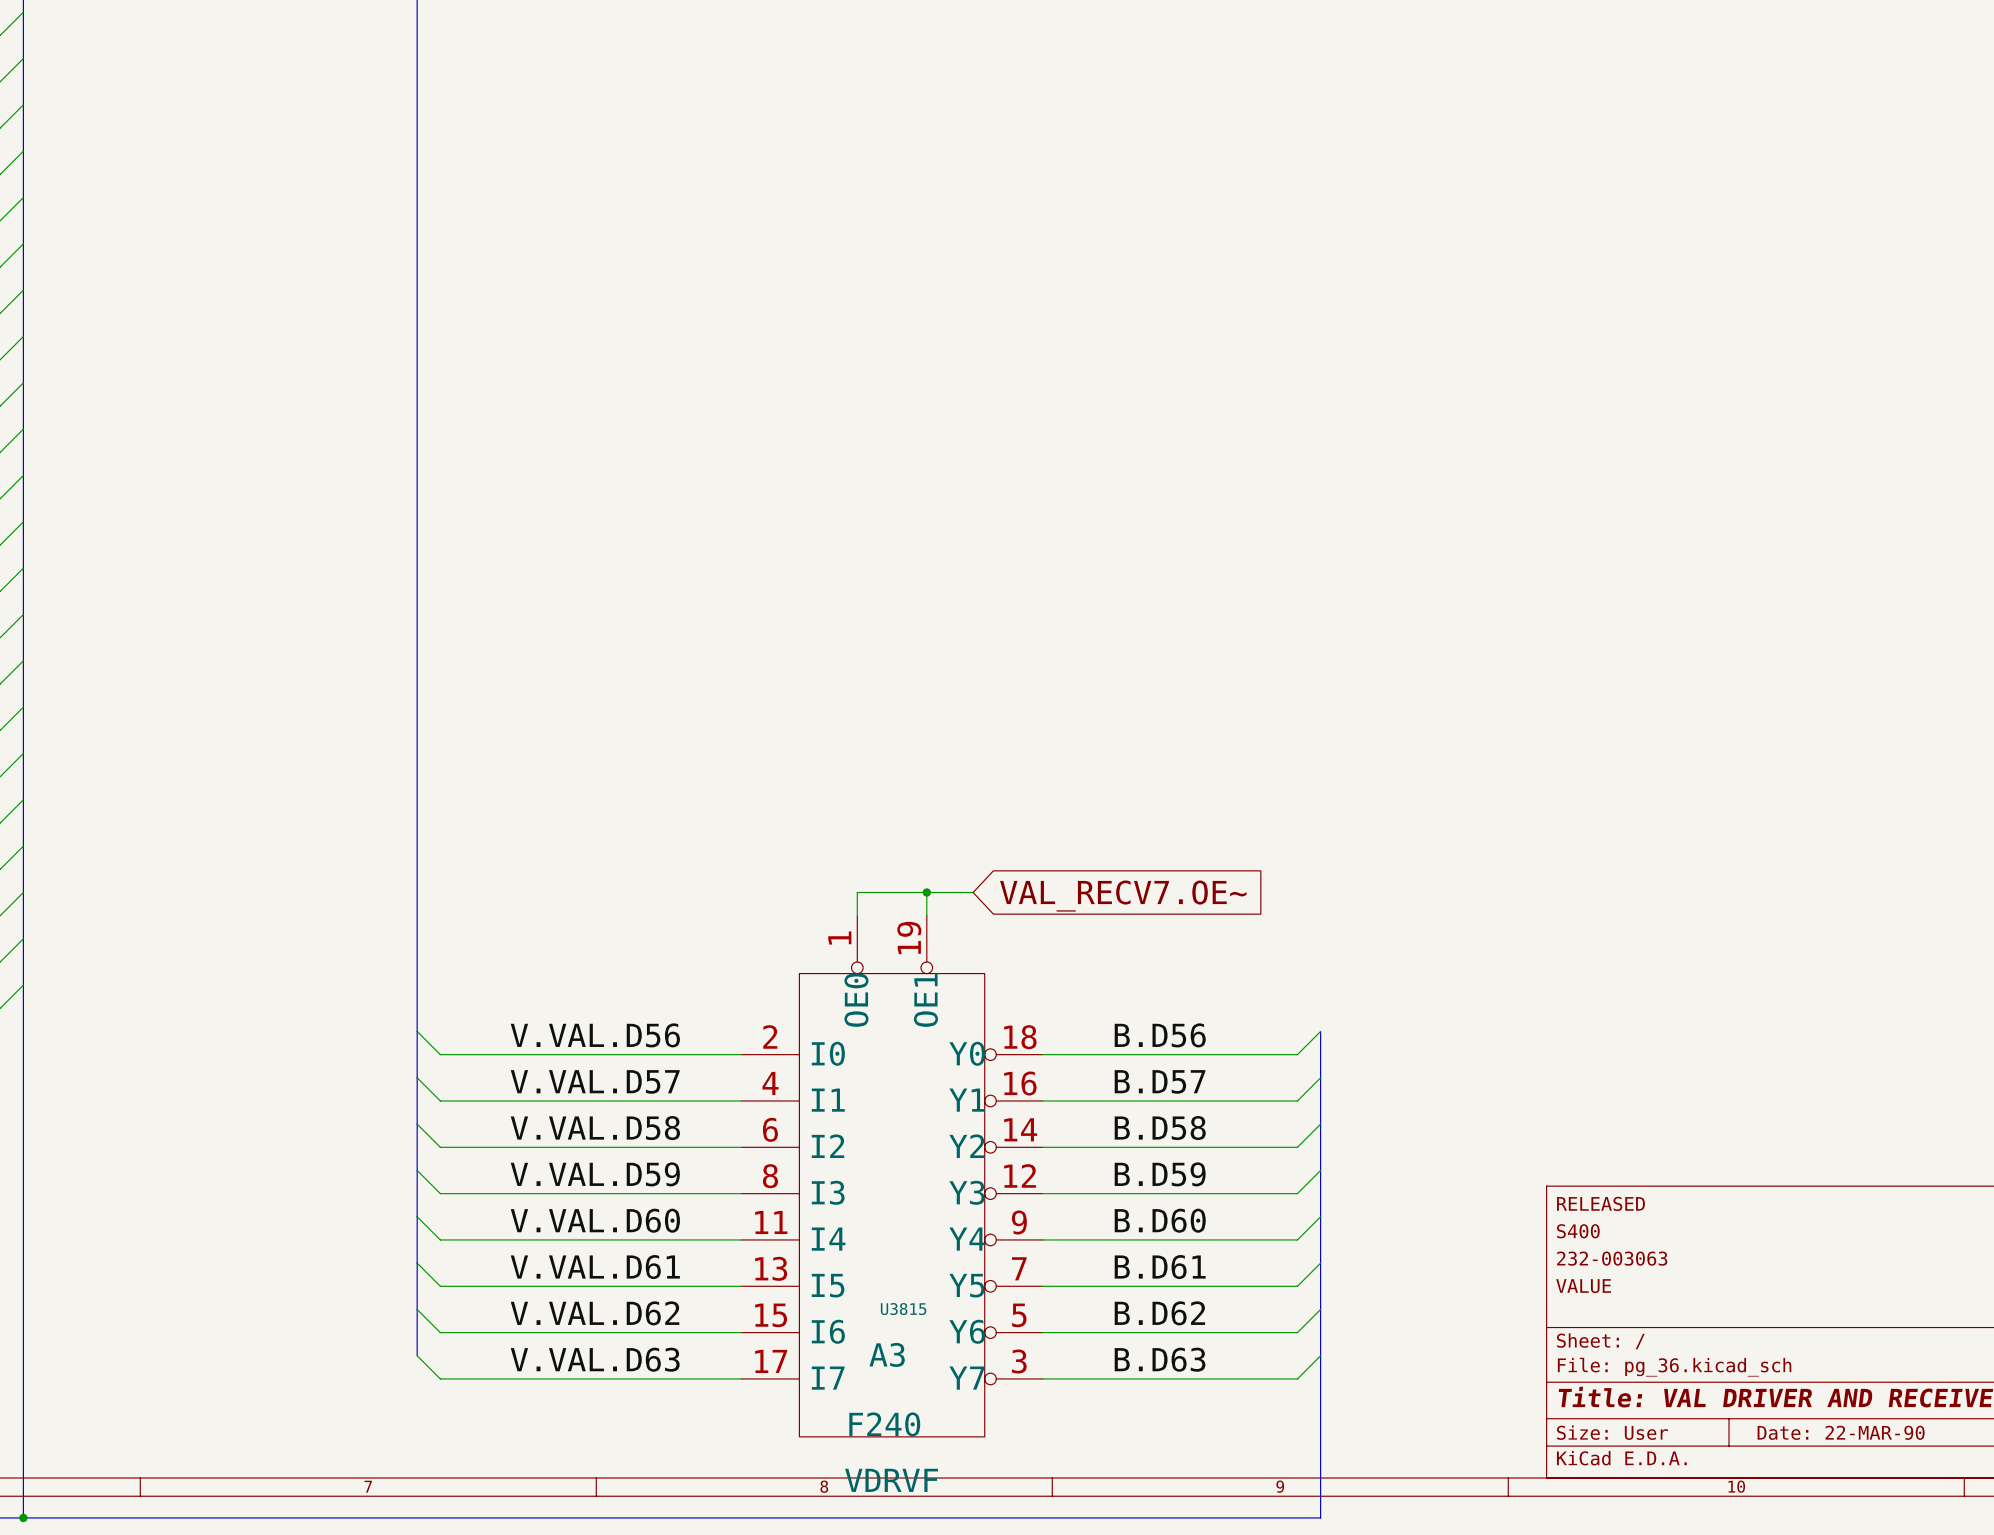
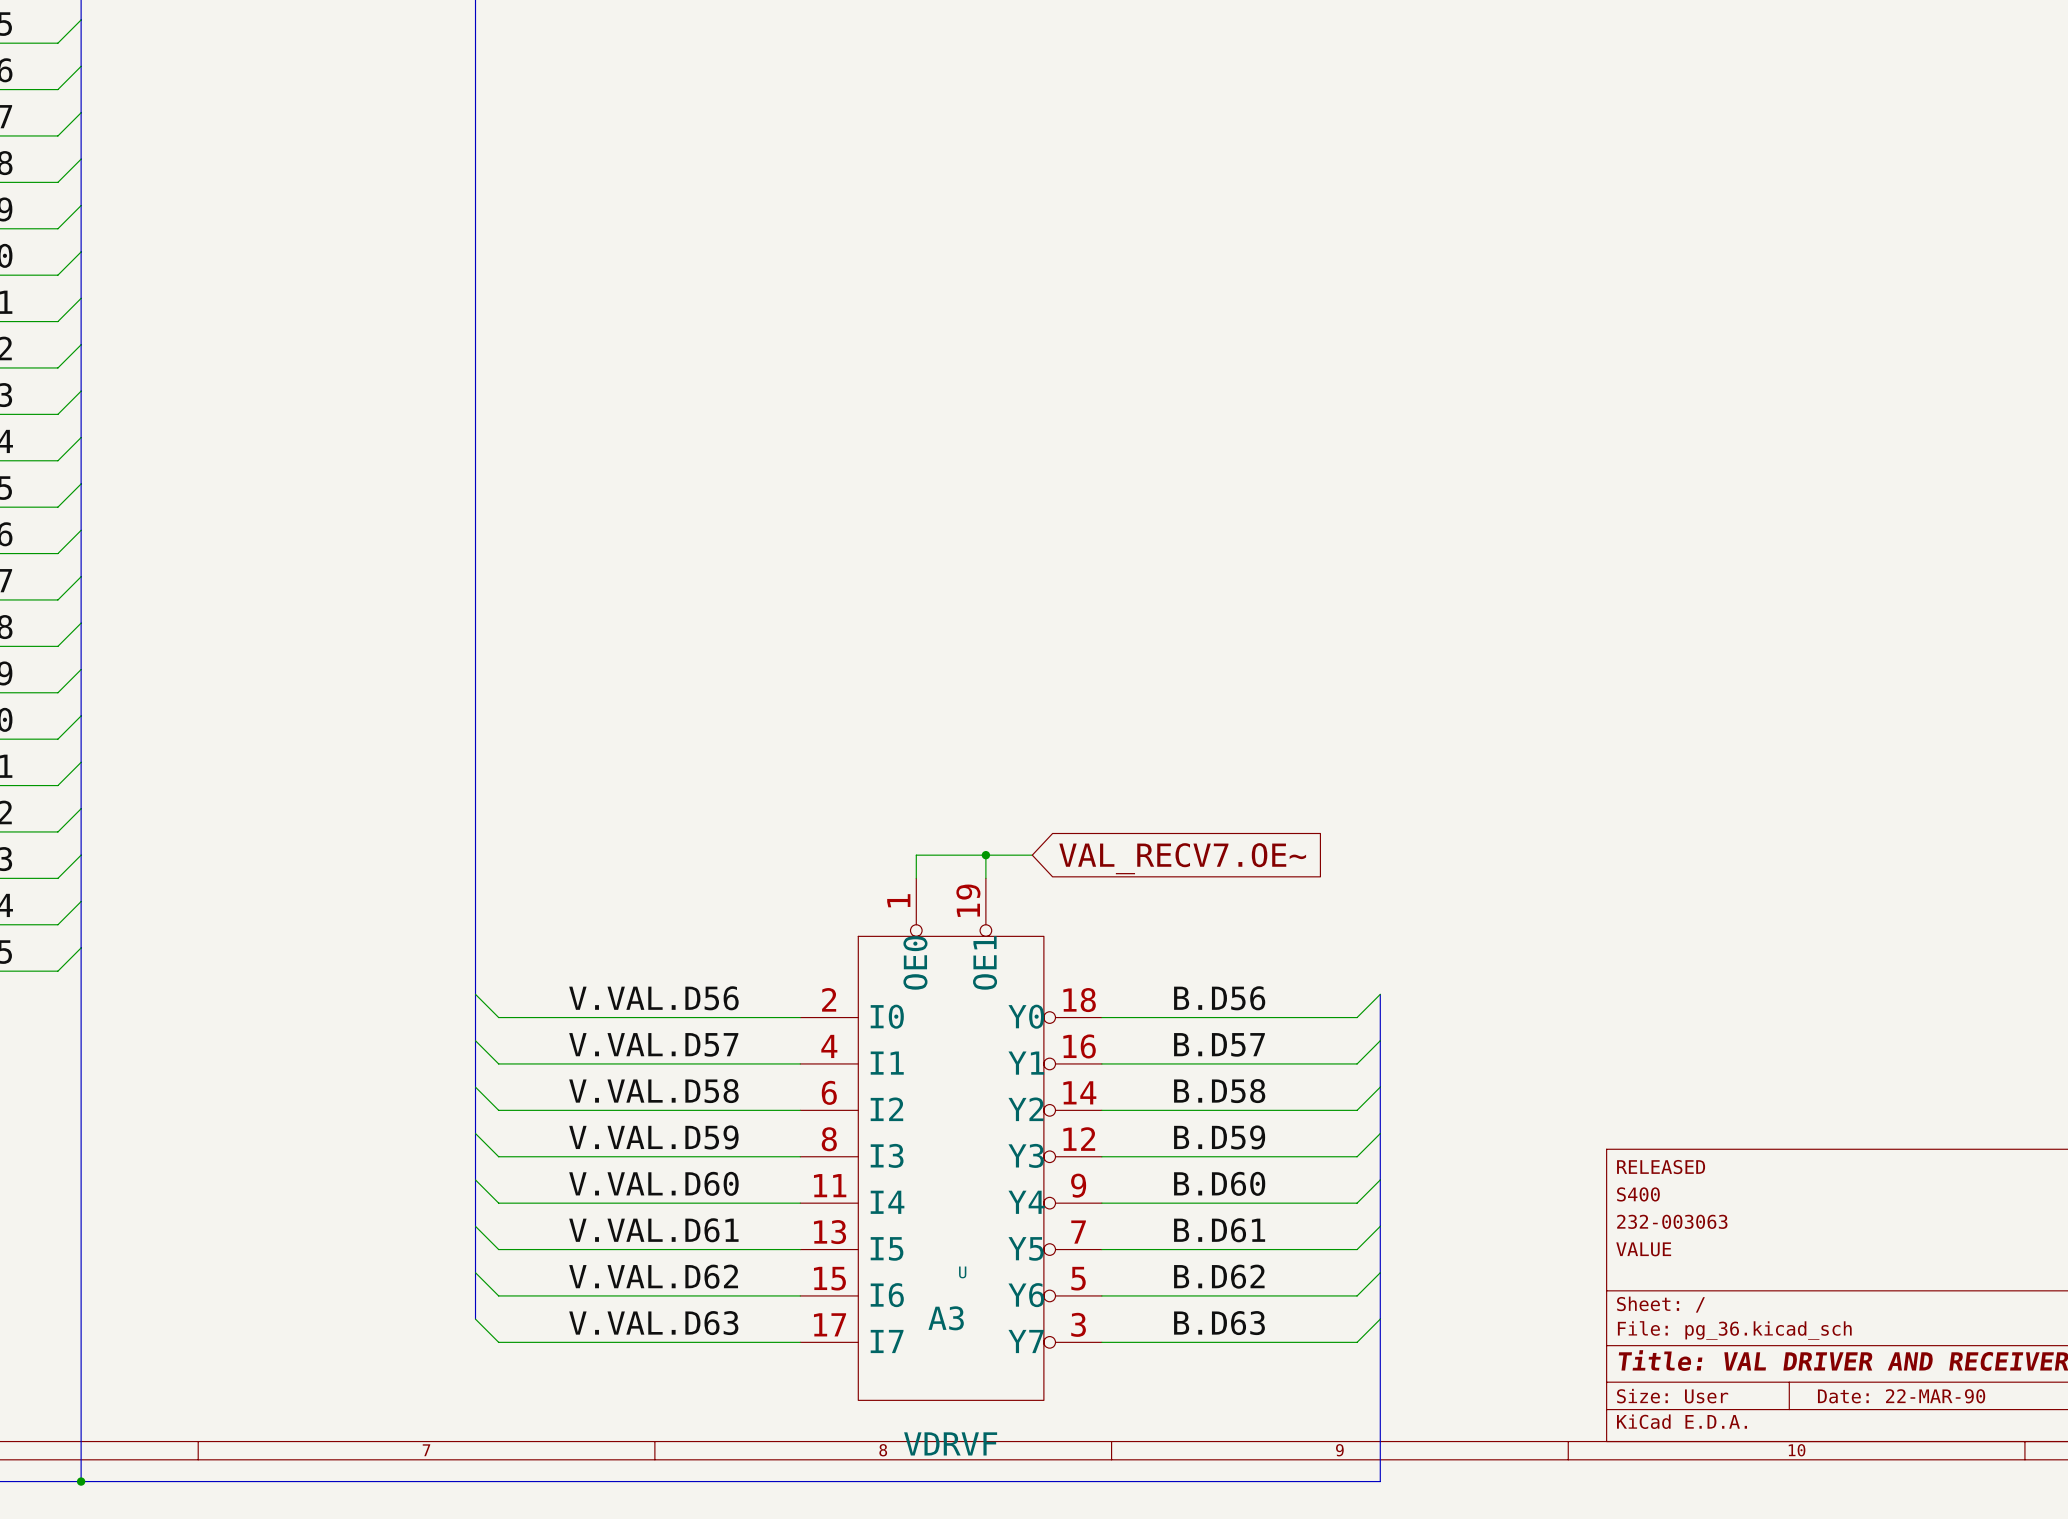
U3815 name: U3815 (903, 1309) -> U (962, 1272)
U3815 value: F240 (884, 1424) -> none

